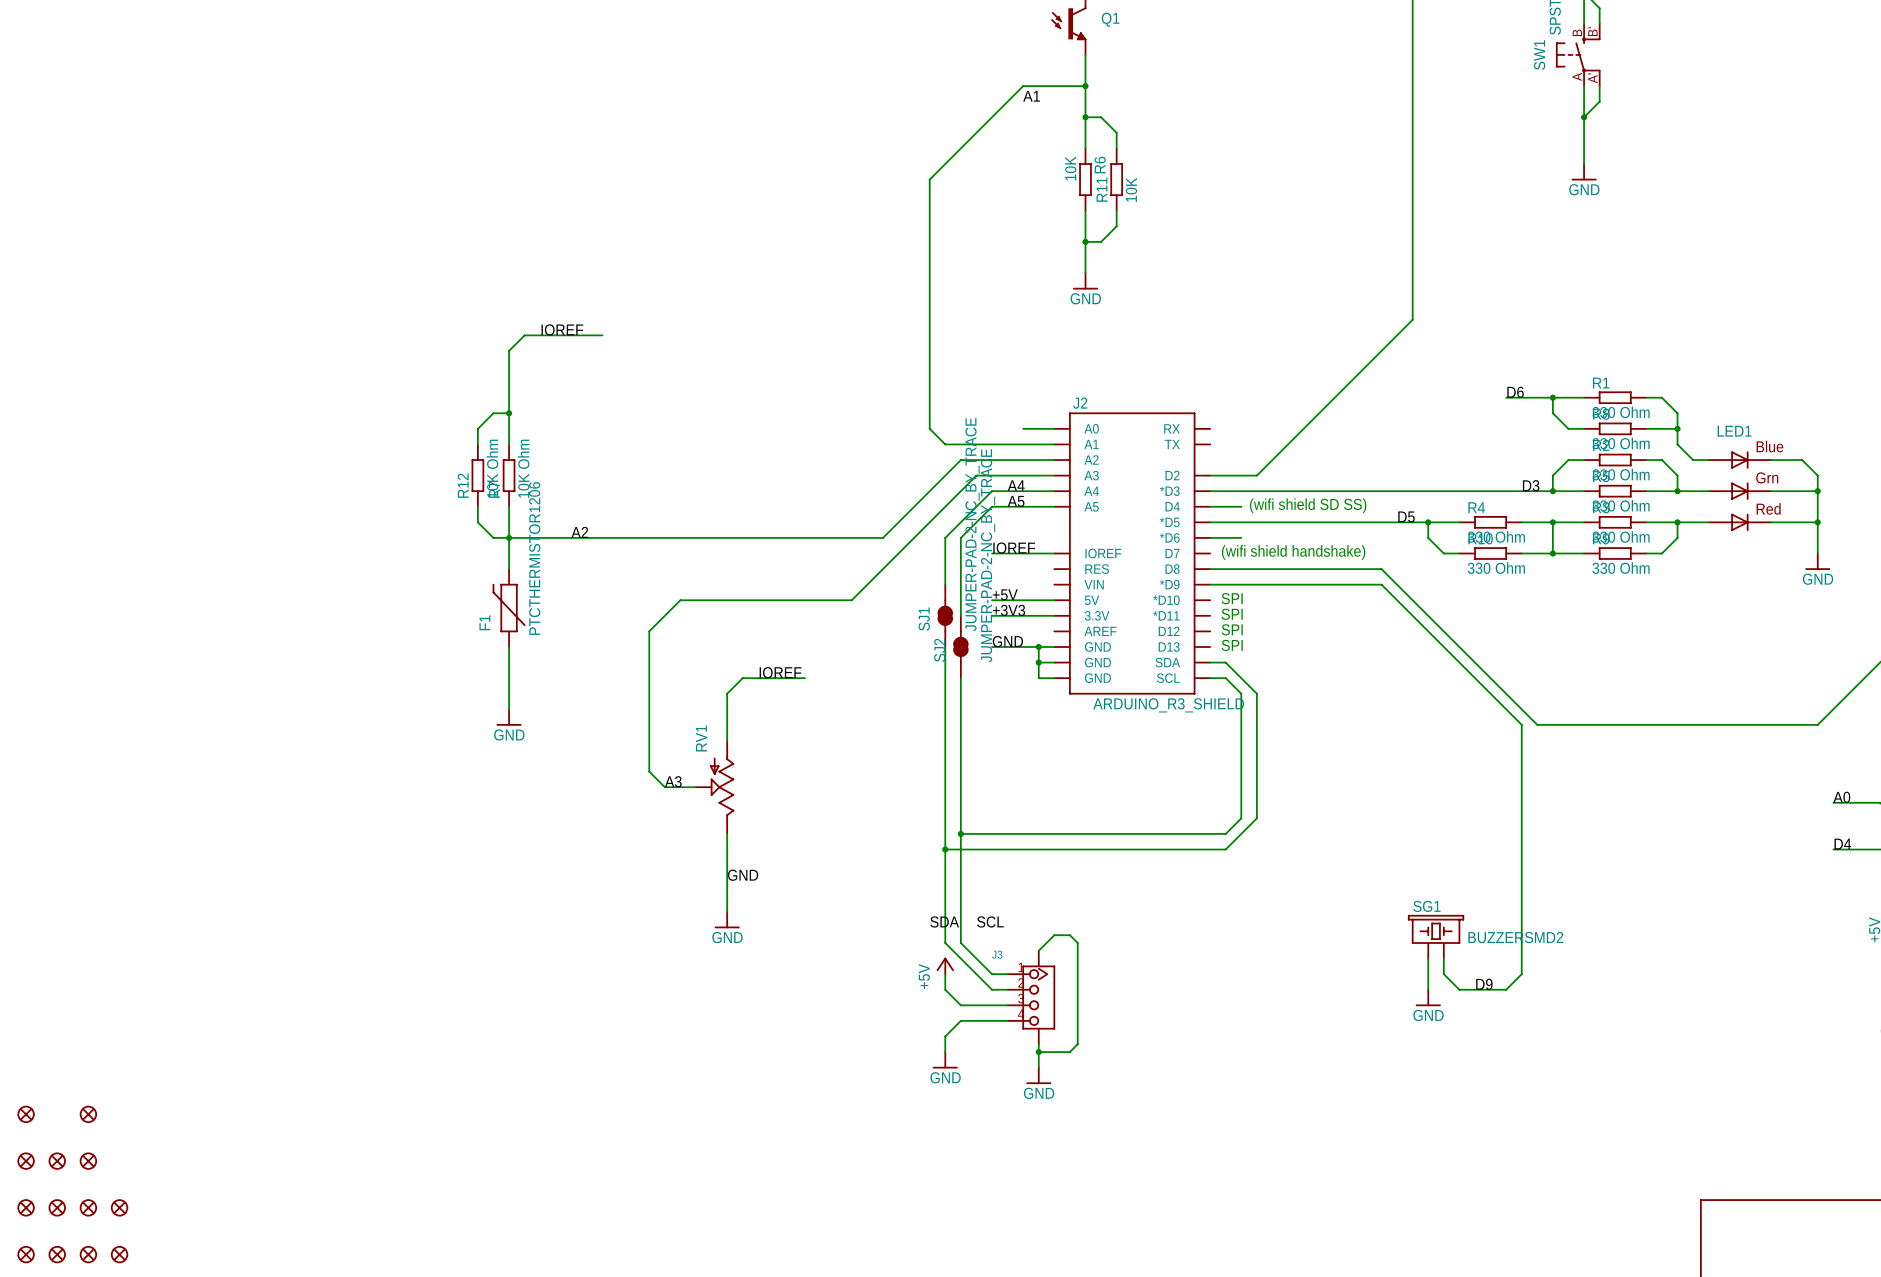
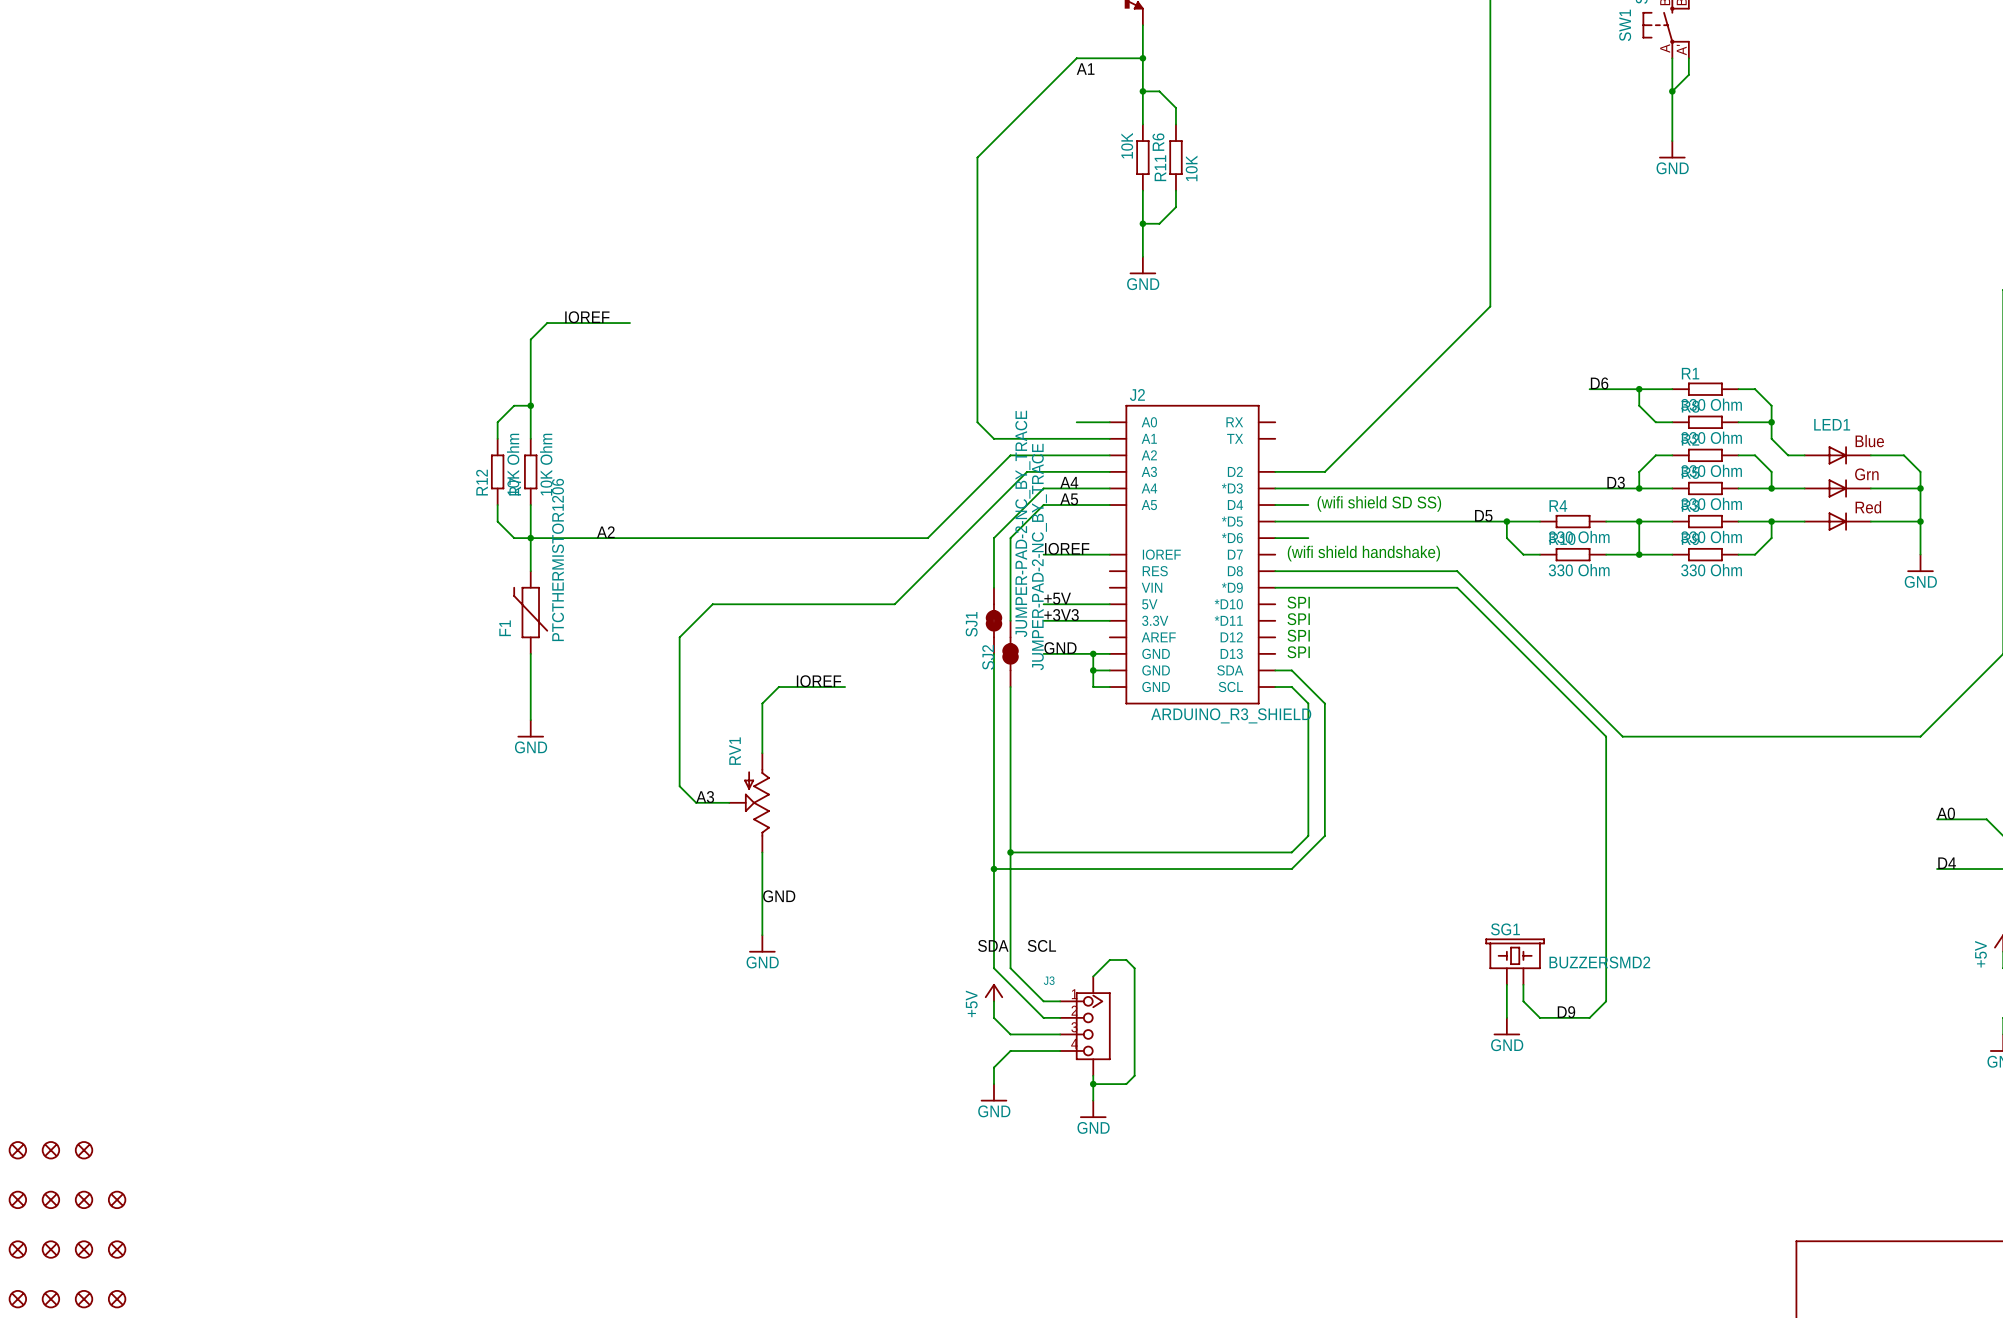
part: none -> (50, 1150)
part: none -> (117, 1199)

